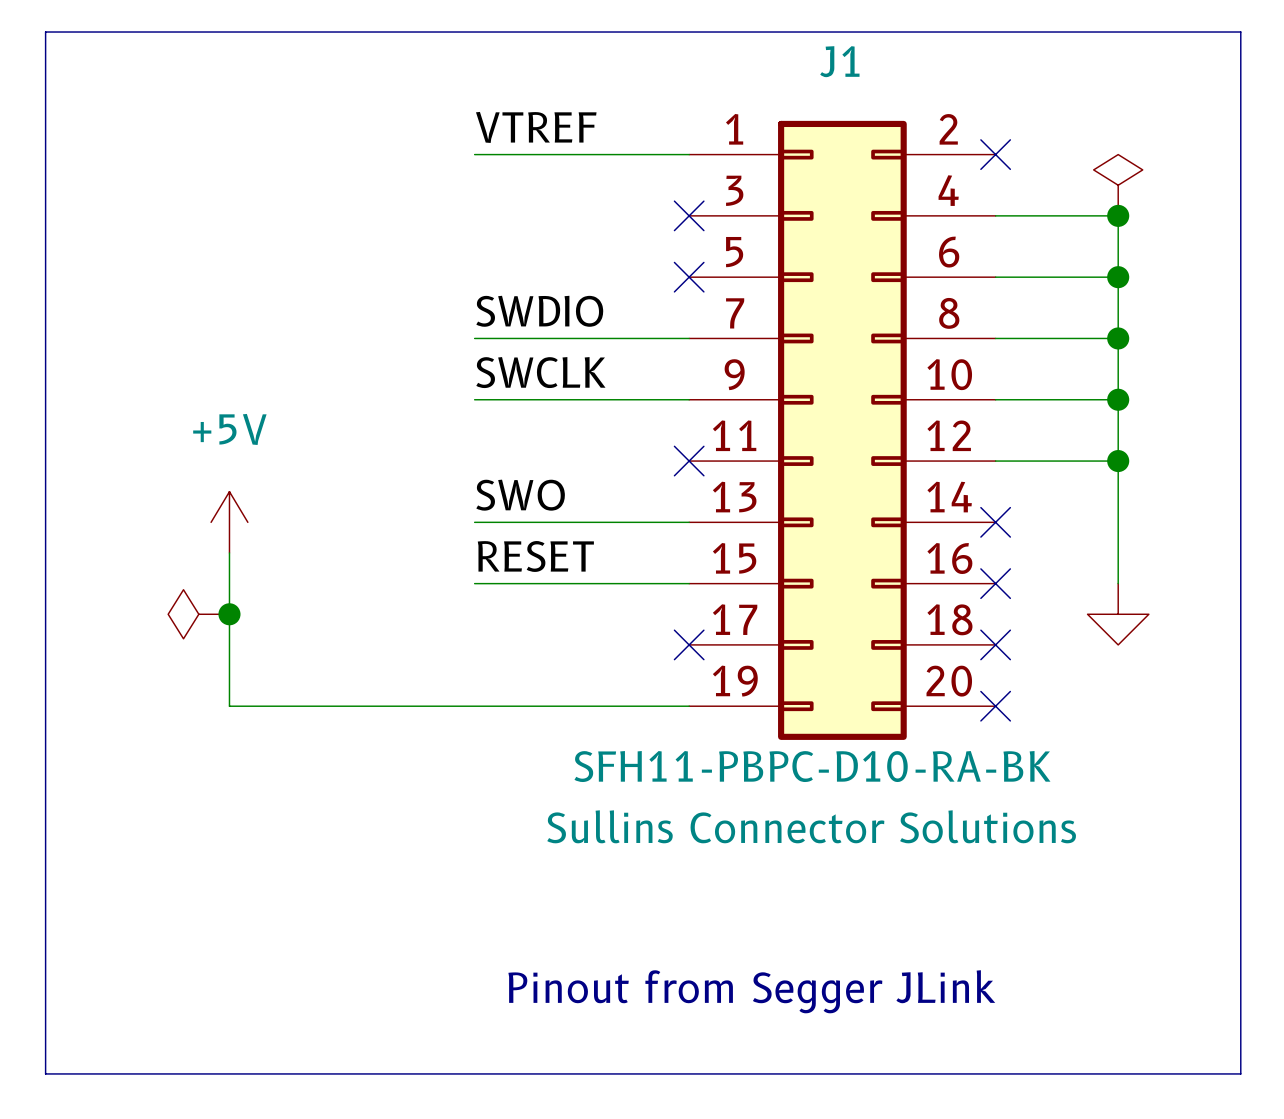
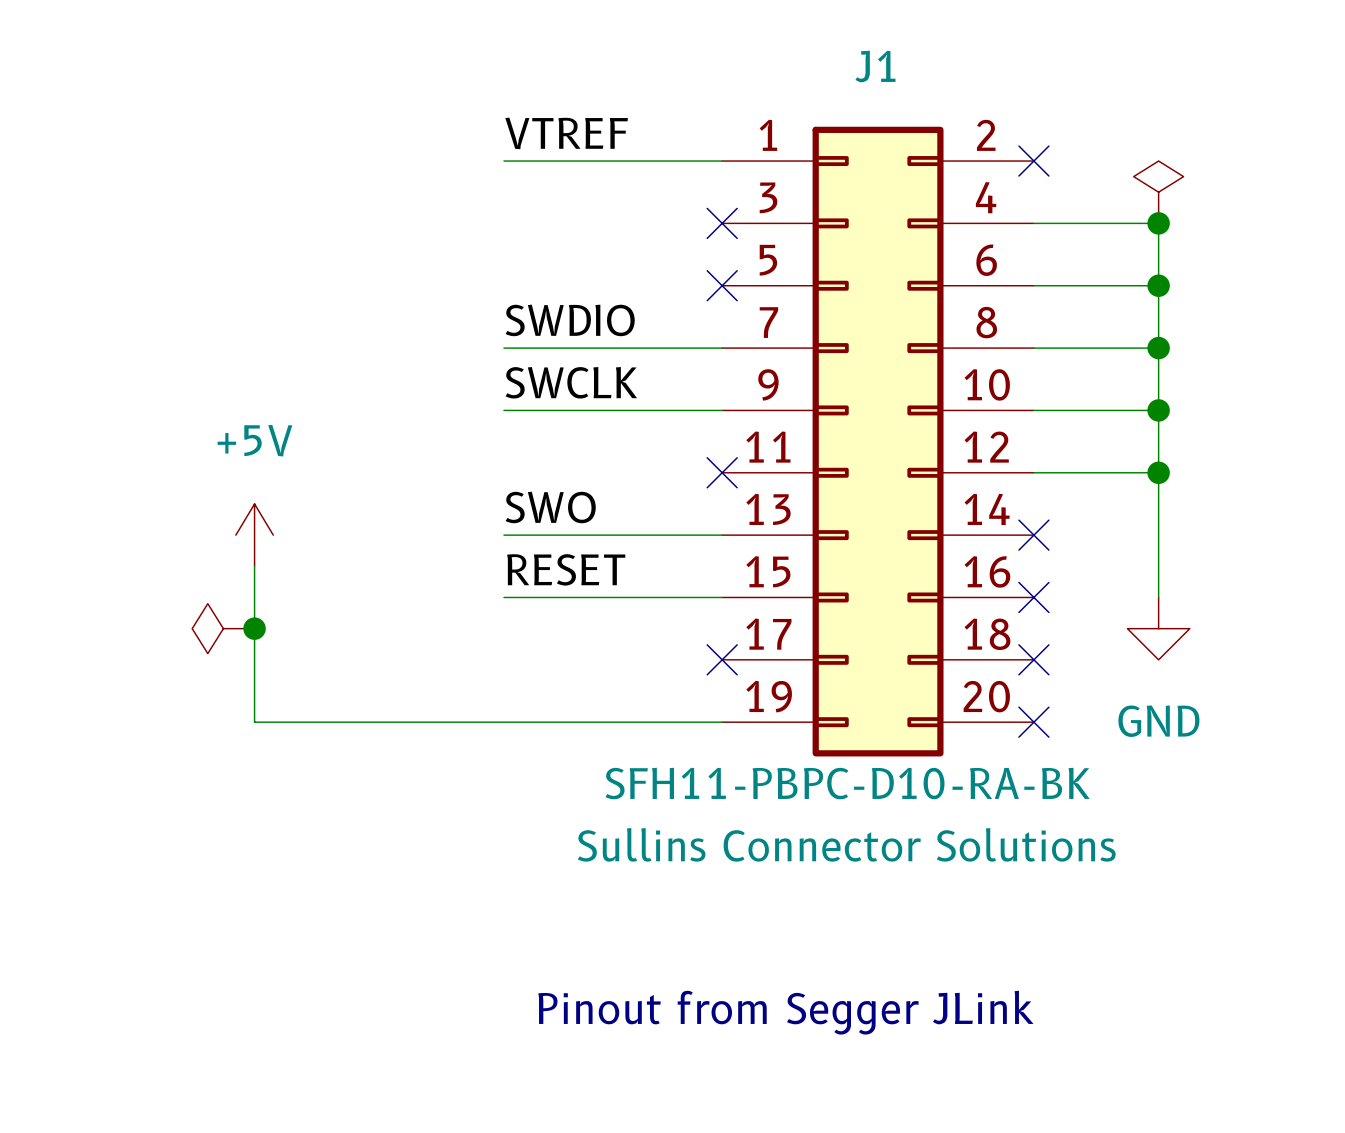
line: (45, 32) (1240, 32) (1240, 1073) (45, 1073) (45, 32) -> none
power symbol text: none -> GND (1158, 721)

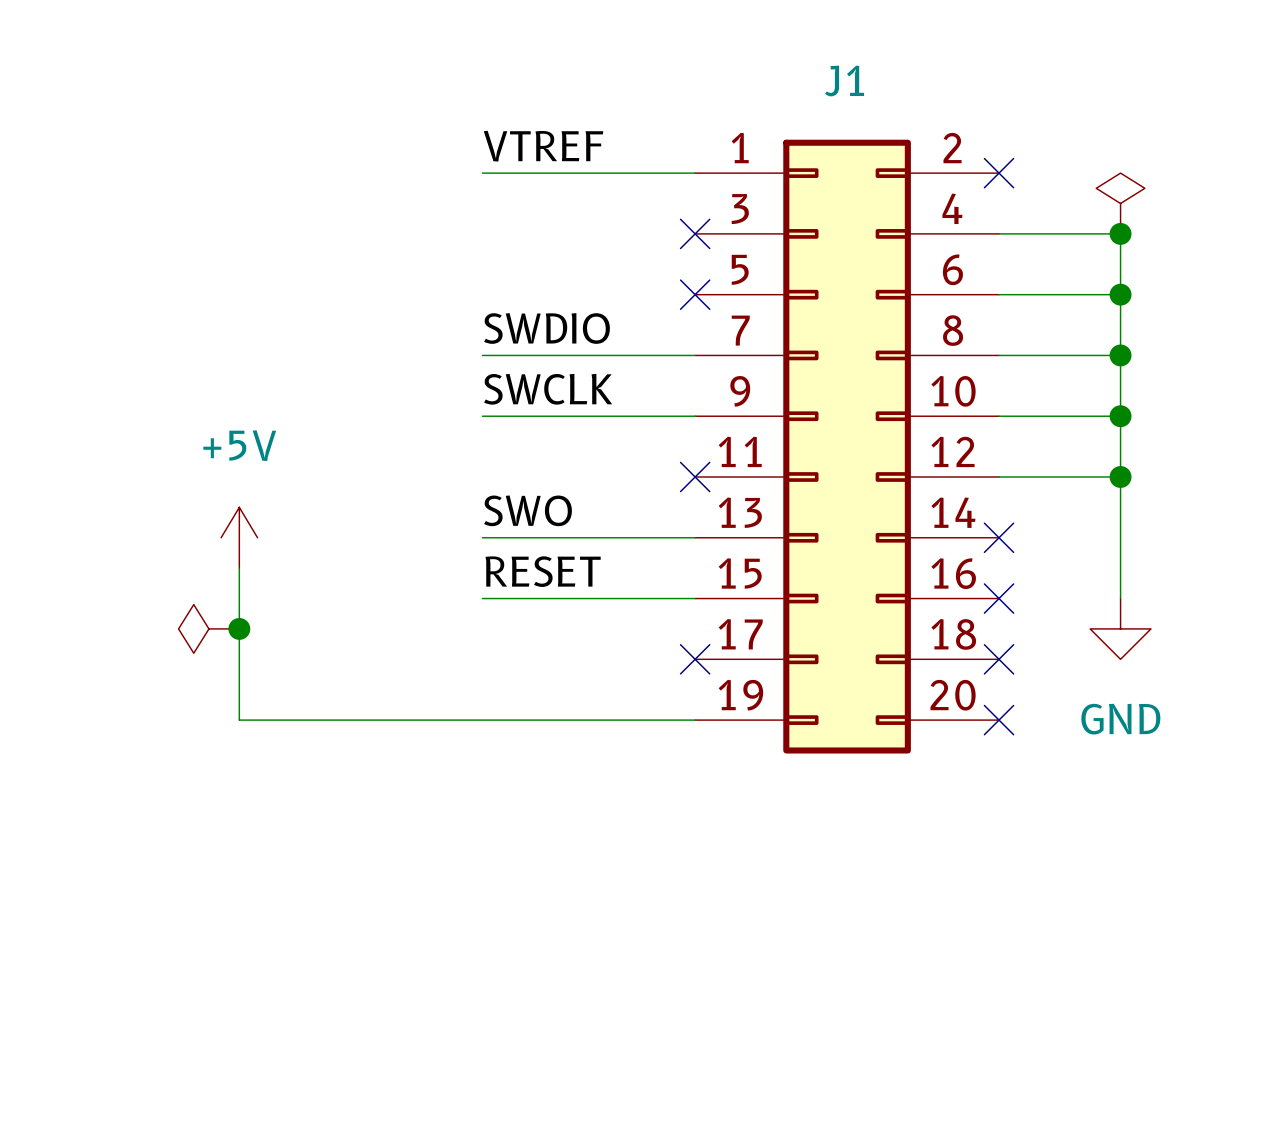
J1 text: SFH11-PBPC-D10-RA-BK (847, 783) -> none
J1 text: Sullins Connector Solutions (846, 844) -> none
text: Pinout from Segger JLink (785, 1012) -> none

